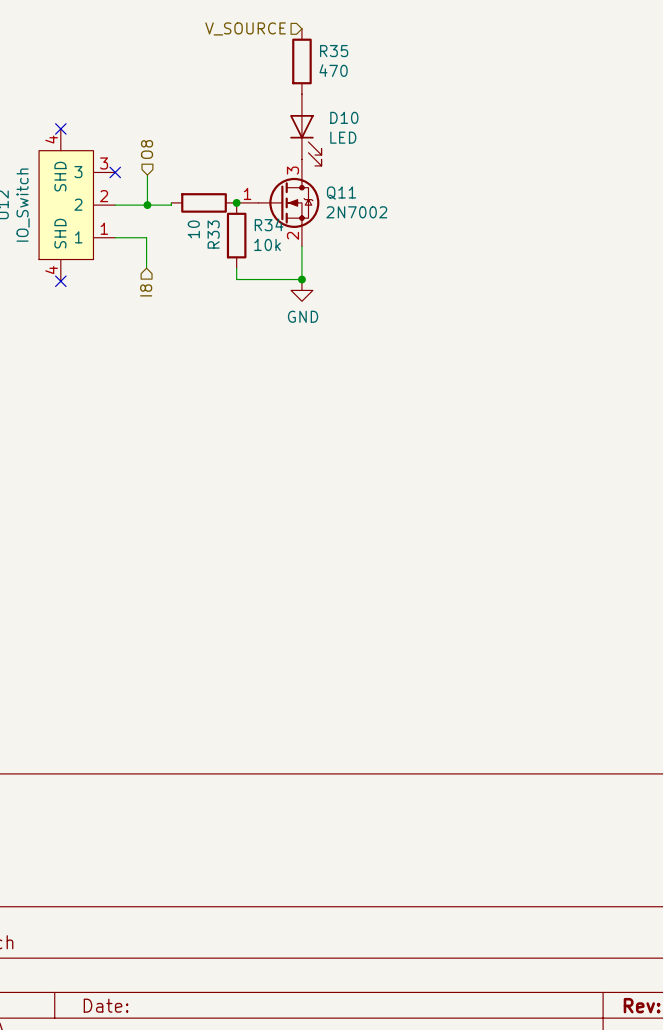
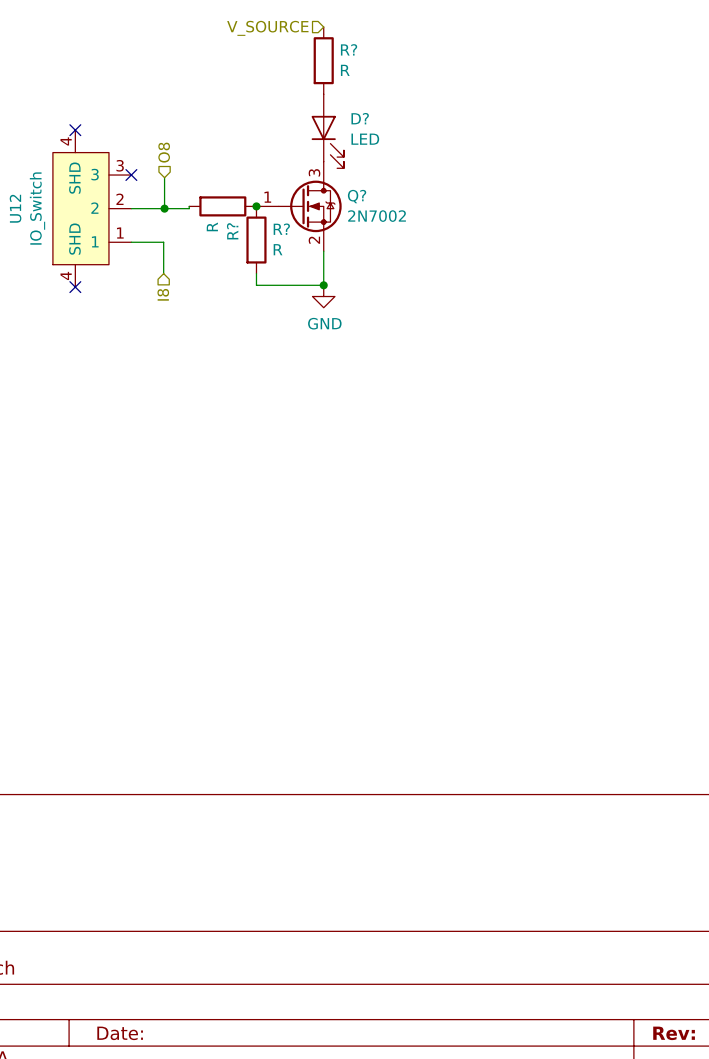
R35 name: R35 (334, 51) -> R? (349, 49)
R35 value: 470 (333, 70) -> R (345, 70)
D10 name: D10 (344, 117) -> D? (360, 118)
Q11 name: Q11 (341, 193) -> Q? (357, 196)
R34 name: R34 (269, 224) -> R? (281, 229)
R33 value: 10 (193, 229) -> R (212, 226)
R33 name: R33 (213, 234) -> R? (232, 231)
R34 value: 10k (267, 244) -> R (278, 249)

